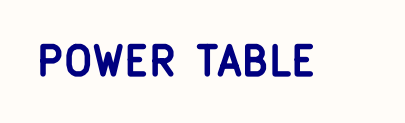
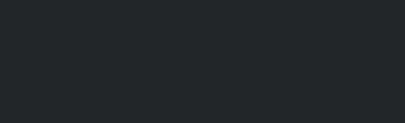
text: POWER TABLE (176, 60) -> none

